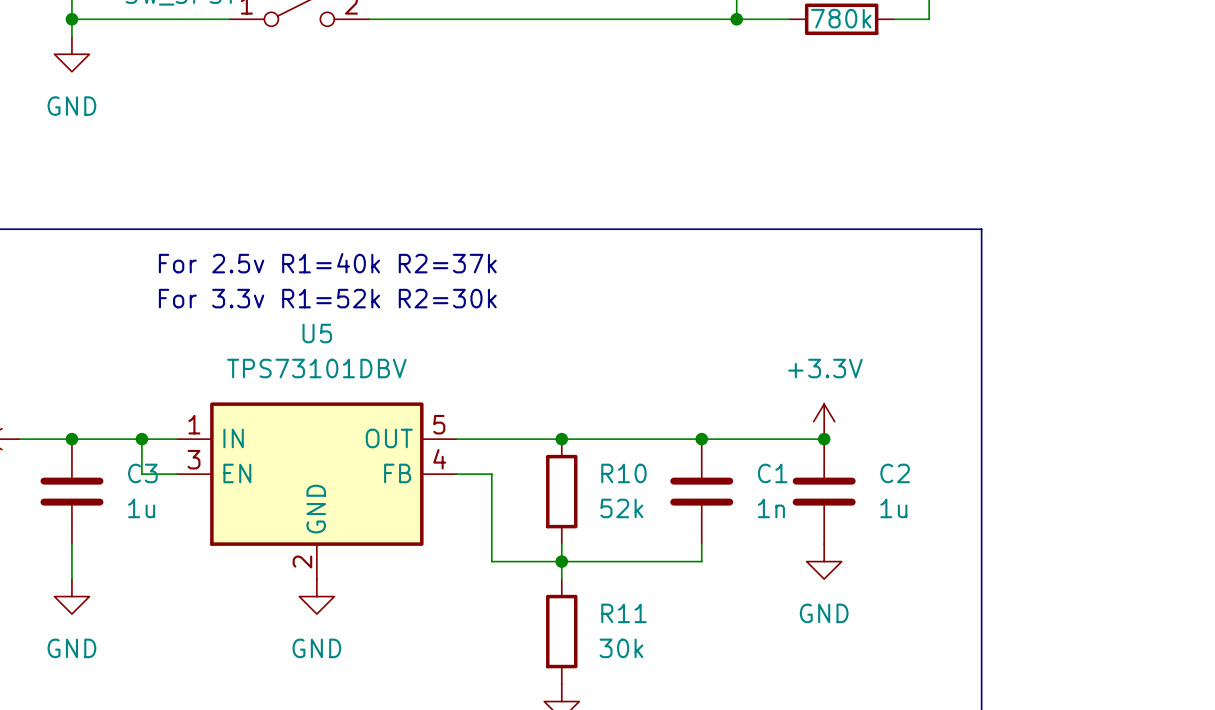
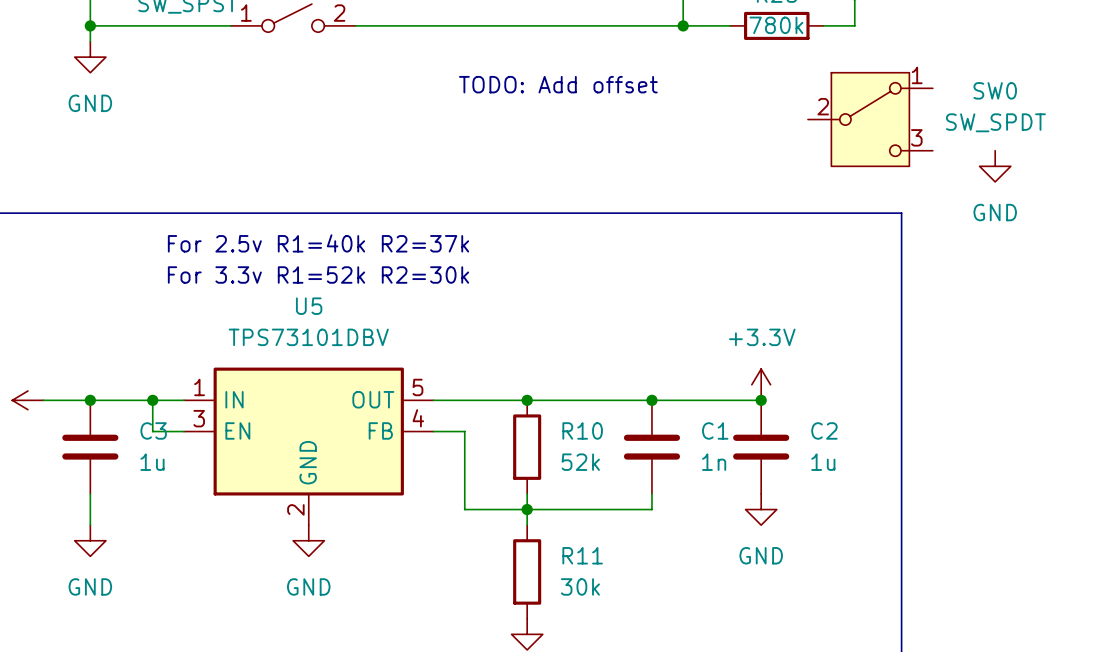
text: none -> TODO: Add offset (558, 84)
SW0: none -> SW_SPDT (870, 119)
power symbol: none -> GND (995, 166)

